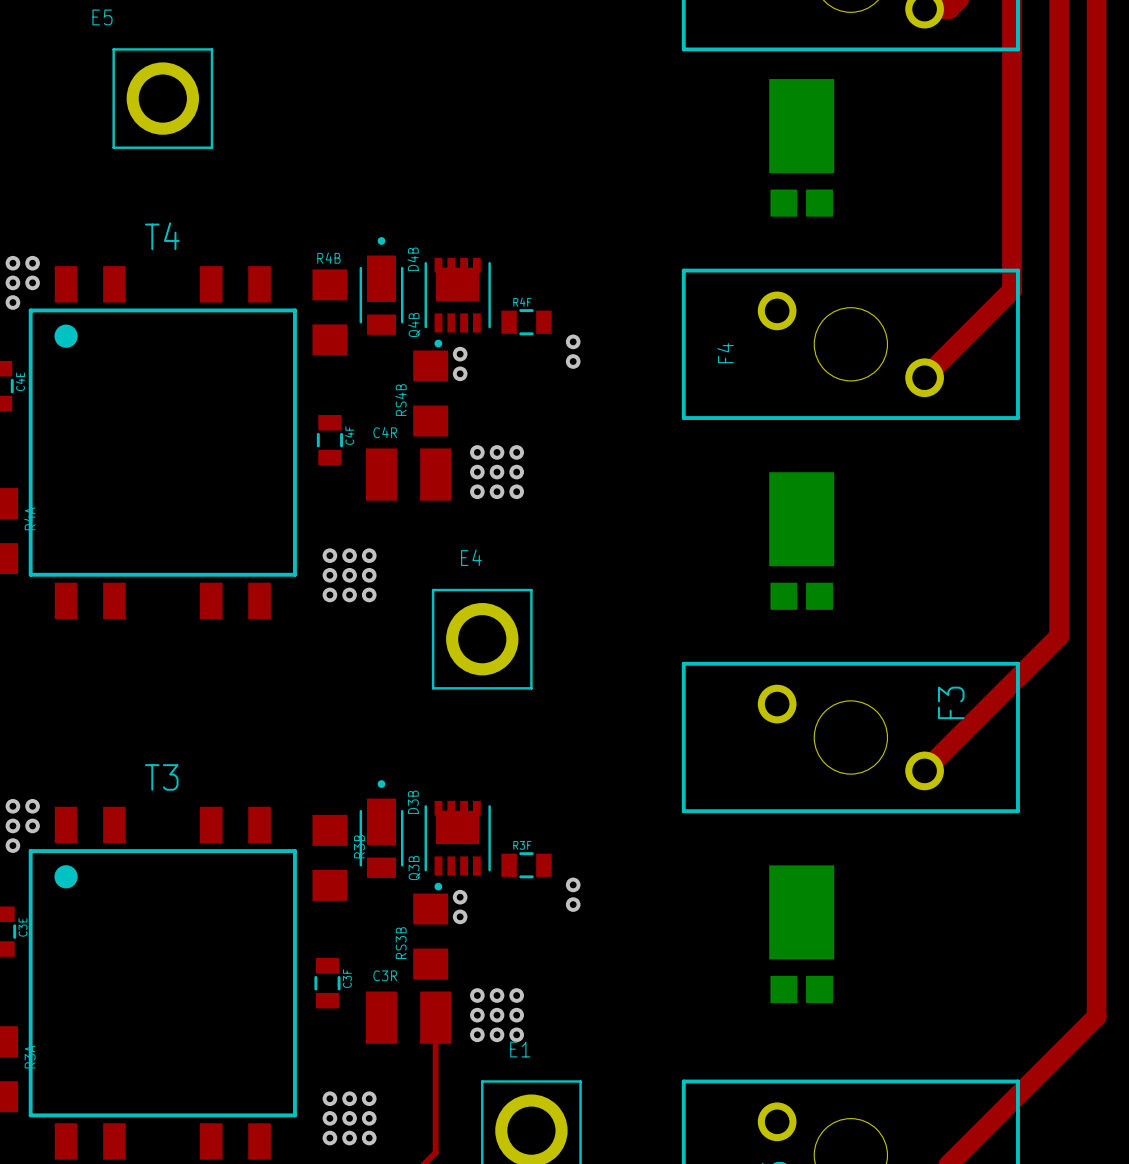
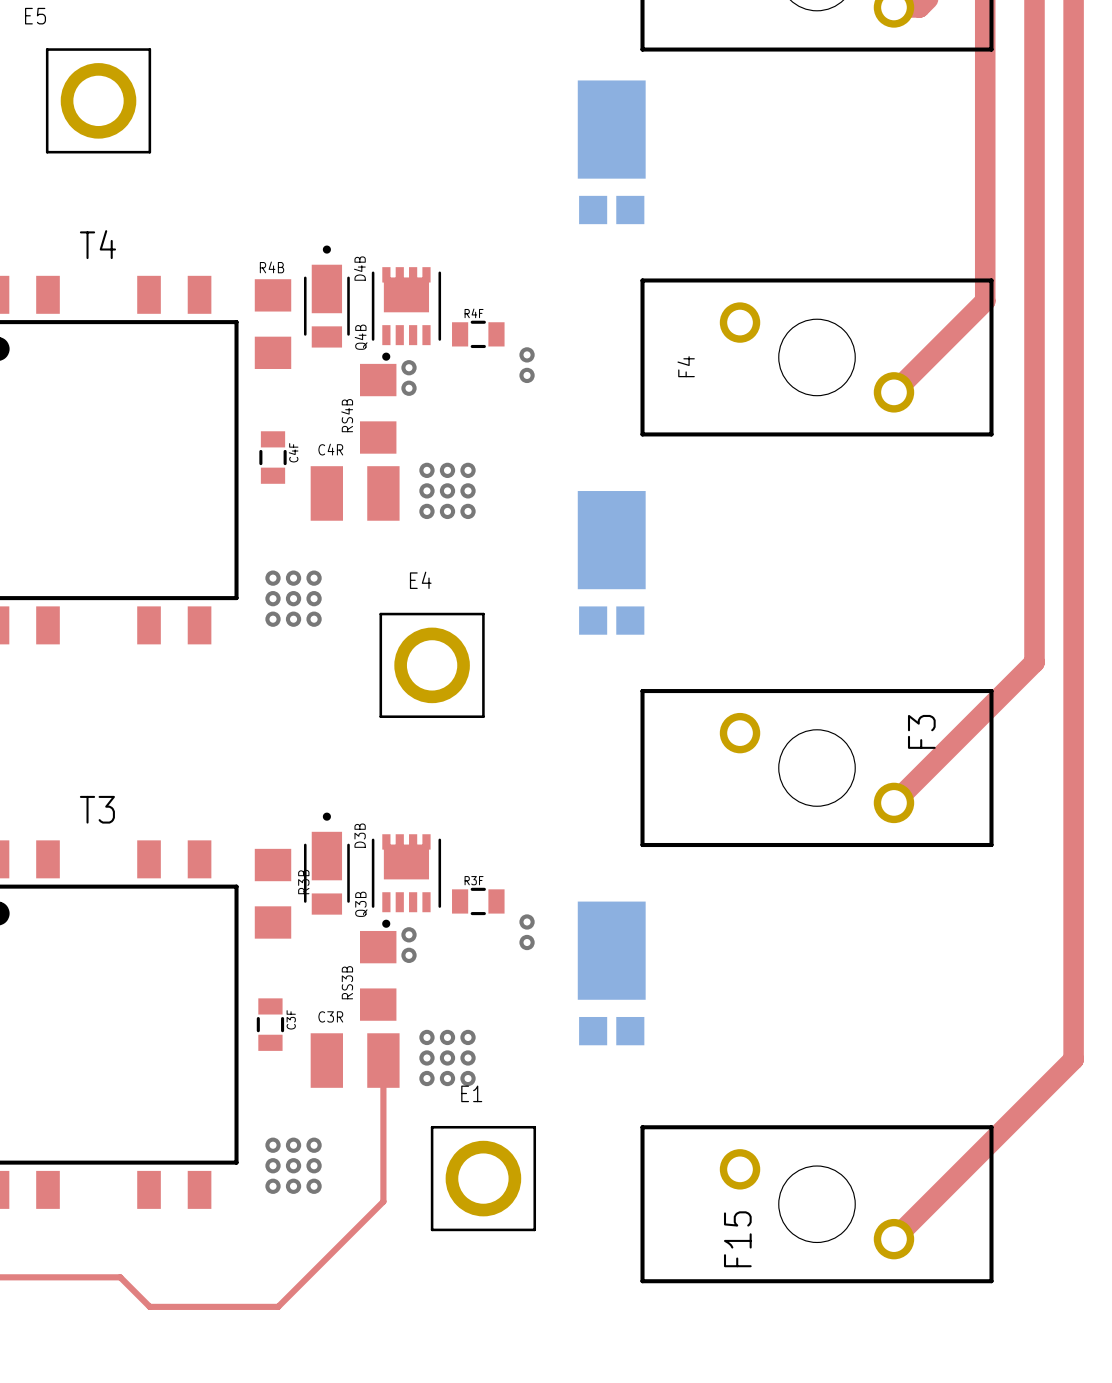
part position: (801, 147) -> (611, 152)
part position: (801, 541) -> (611, 562)
part position: (801, 934) -> (611, 973)

